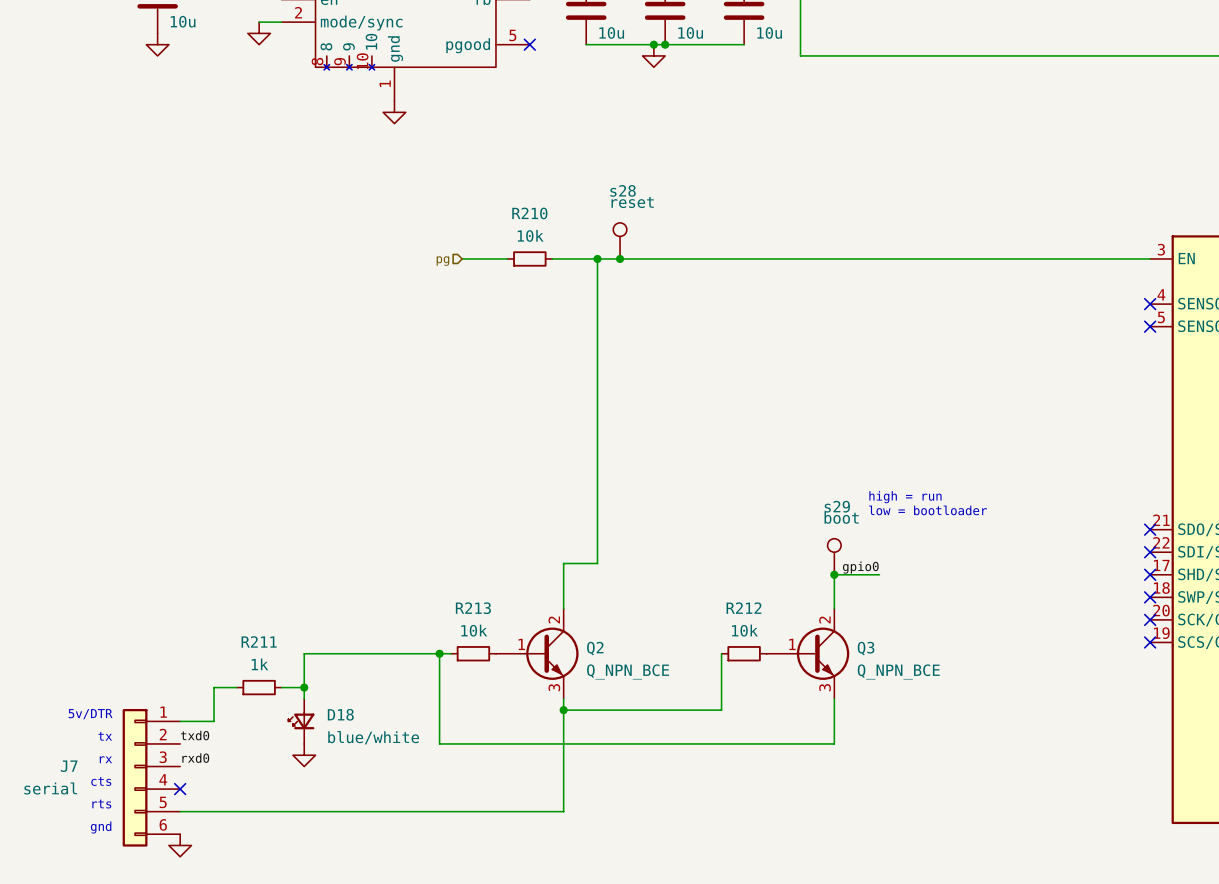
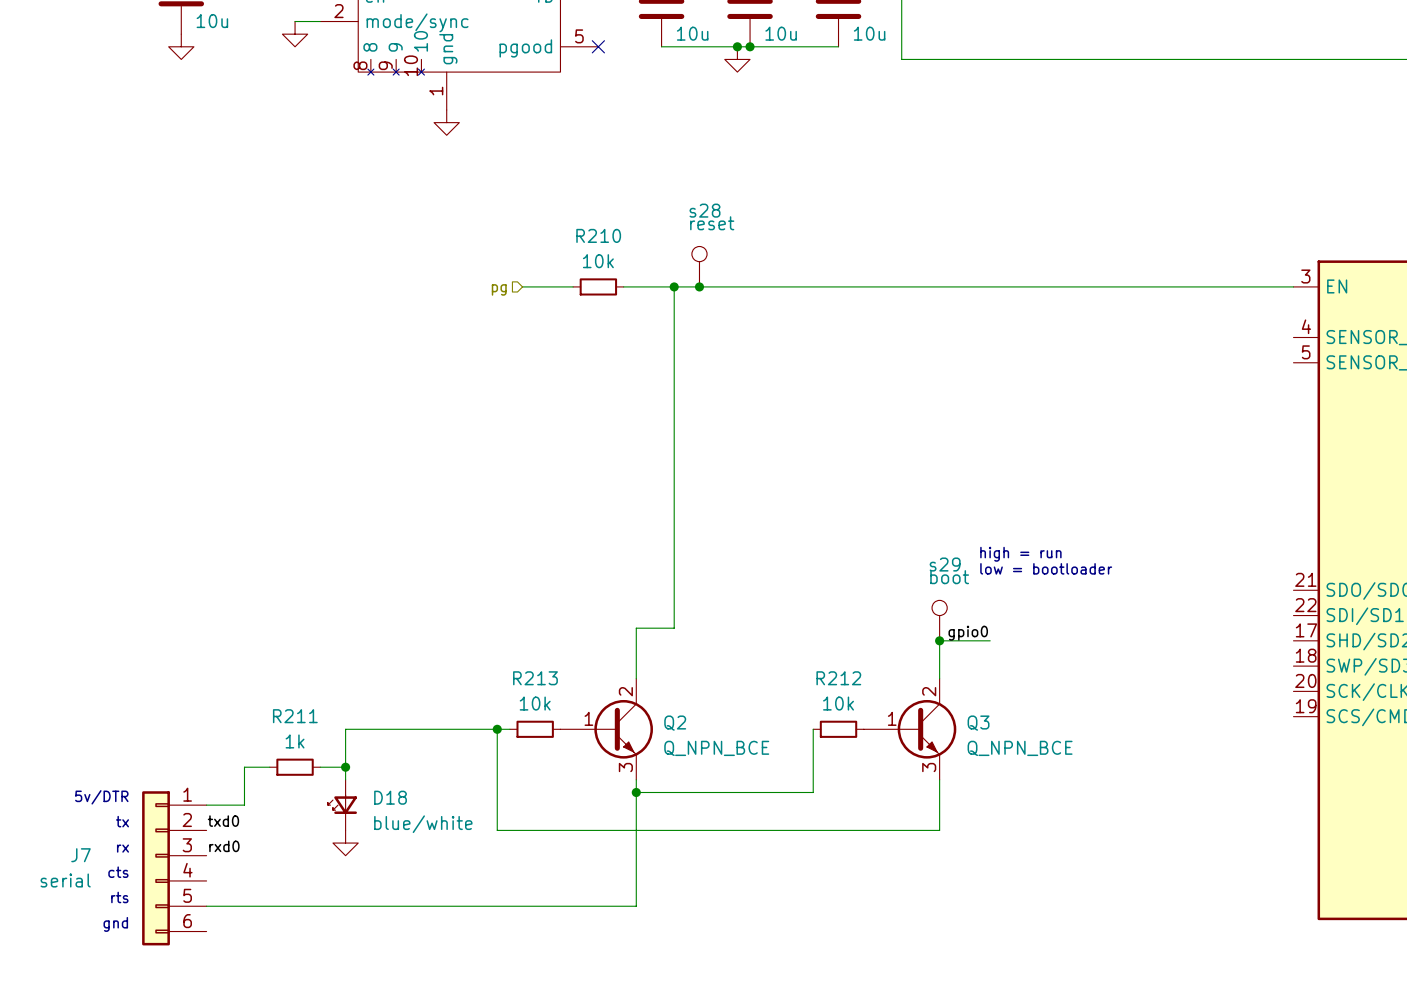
no-connect mark: (1150, 304) -> none
no-connect mark: (1150, 326) -> none
no-connect mark: (1150, 529) -> none
no-connect mark: (1150, 552) -> none
no-connect mark: (1150, 574) -> none
no-connect mark: (1150, 597) -> none
no-connect mark: (1150, 619) -> none
no-connect mark: (1150, 642) -> none
no-connect mark: (180, 789) -> none
power symbol: (180, 845) -> none

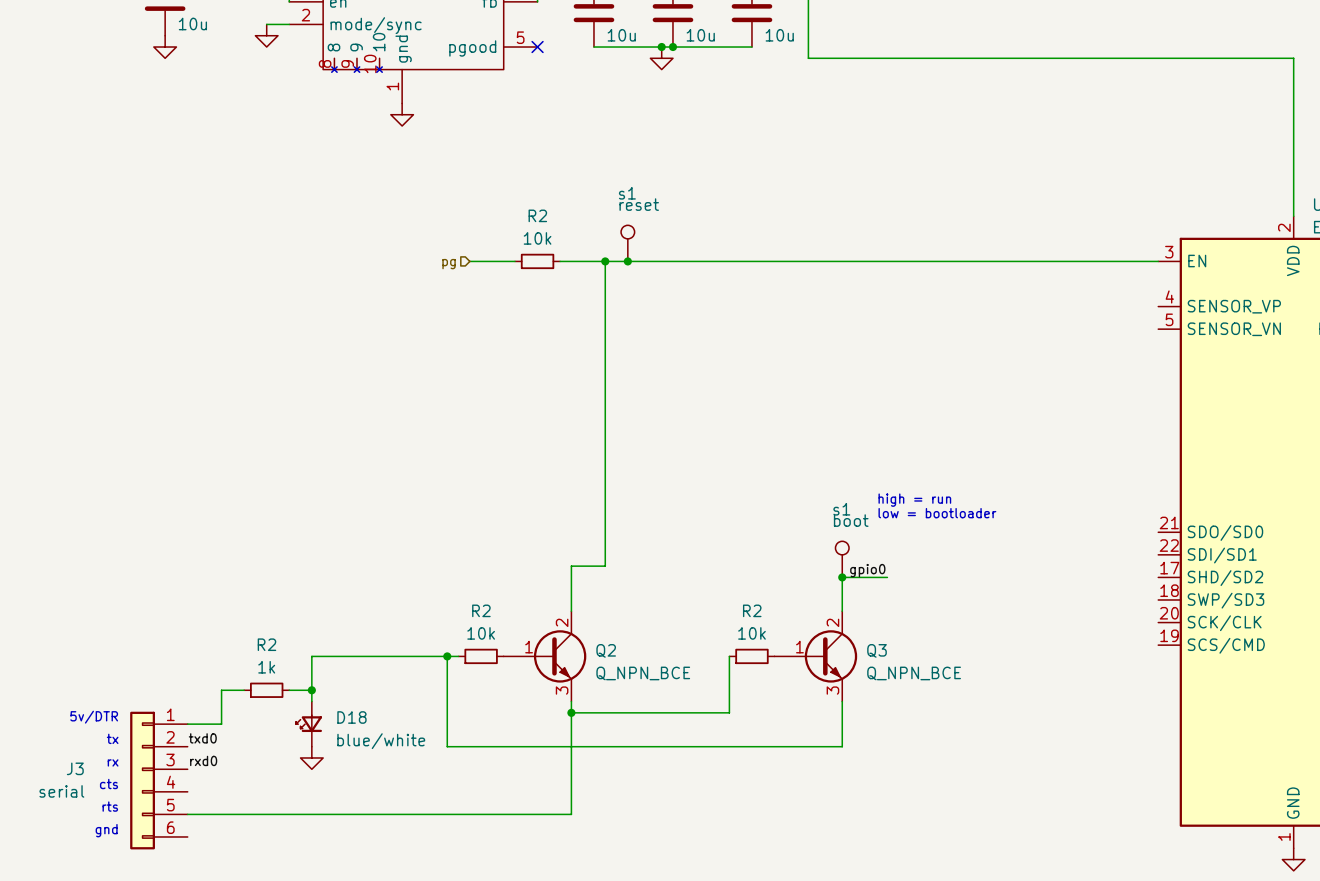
s28 name: s28 (705, 210) -> s1 (627, 193)
R210 name: R210 (598, 235) -> R2 (537, 215)
s29 name: s29 (945, 564) -> s1 (841, 509)
R213 name: R213 (535, 678) -> R2 (481, 610)
R212 name: R212 (838, 678) -> R2 (752, 610)
R211 name: R211 (295, 716) -> R2 (266, 644)
J7 name: J7 (80, 855) -> J3 (75, 768)

